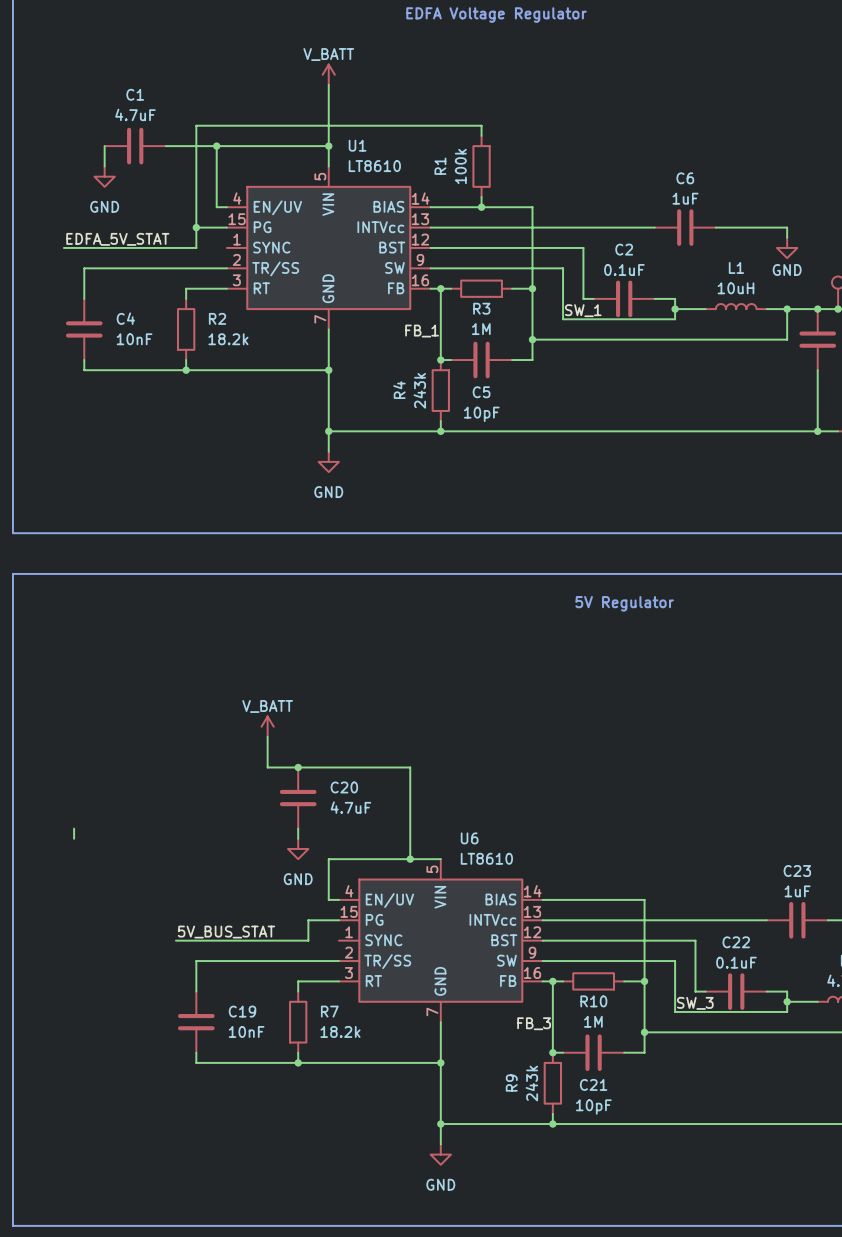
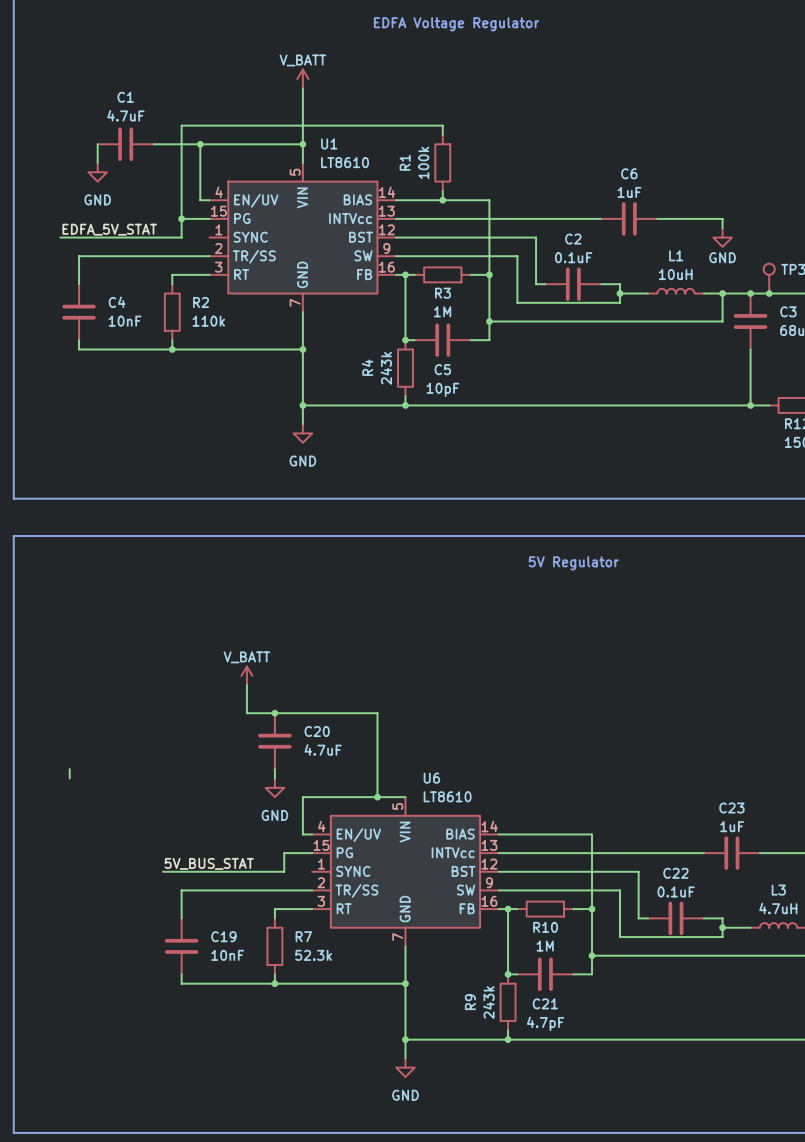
label: SW_1 (583, 310) -> none
label: FB_1 (422, 331) -> none
R2 value: 18.2k (228, 339) -> 110k (208, 321)
label: SW_3 (695, 1003) -> none
label: FB_3 (534, 1023) -> none
R7 value: 18.2k (340, 1031) -> 52.3k (313, 955)
C21 value: 10pF (593, 1107) -> 4.7pF (545, 1023)

